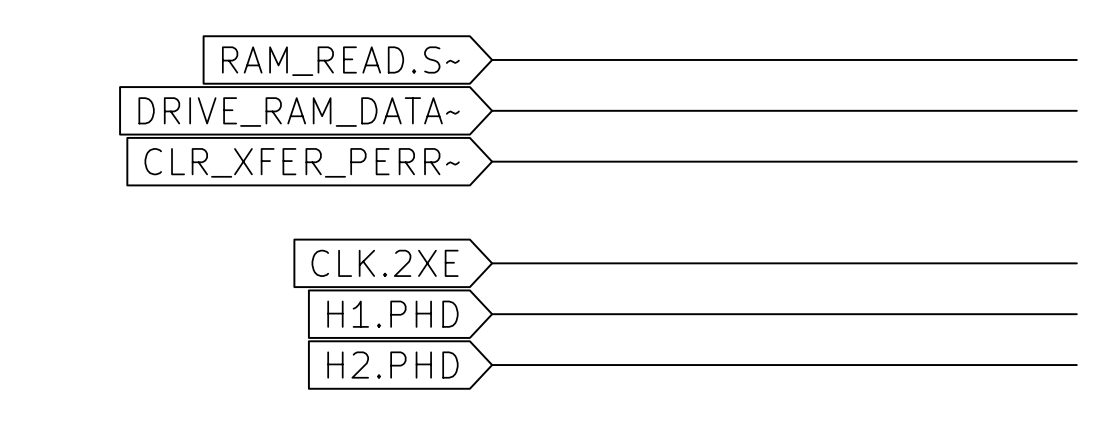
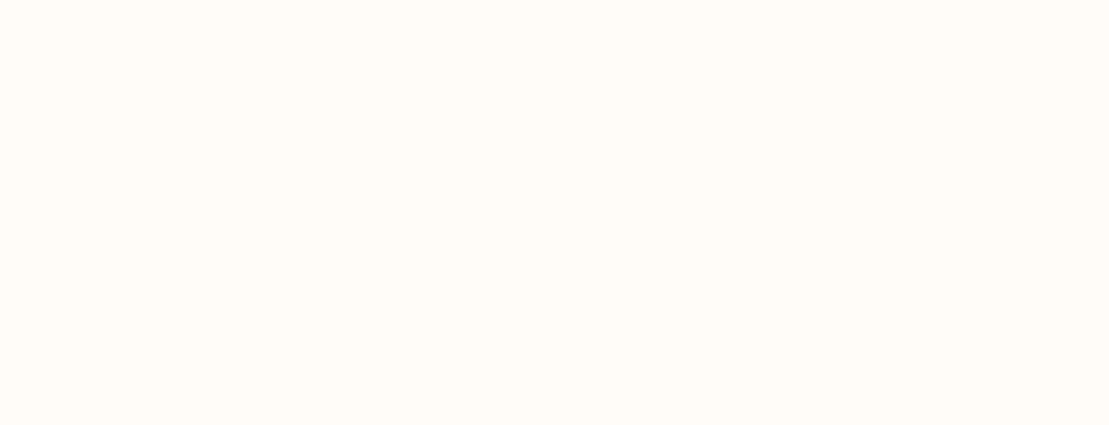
wire: (492, 59) (1076, 59) -> none
global label: RAM_READ.S~ (340, 61) -> none
wire: (492, 110) (1076, 110) -> none
global label: DRIVE_RAM_DATA~ (299, 112) -> none
wire: (492, 161) (1076, 161) -> none
global label: CLR_XFER_PERR~ (302, 162) -> none
global label: CLK.2XE (385, 263) -> none
wire: (492, 263) (1076, 263) -> none
global label: H1.PHD (392, 314) -> none
wire: (492, 314) (1076, 314) -> none
global label: H2.PHD (392, 365) -> none
wire: (492, 365) (1076, 365) -> none

